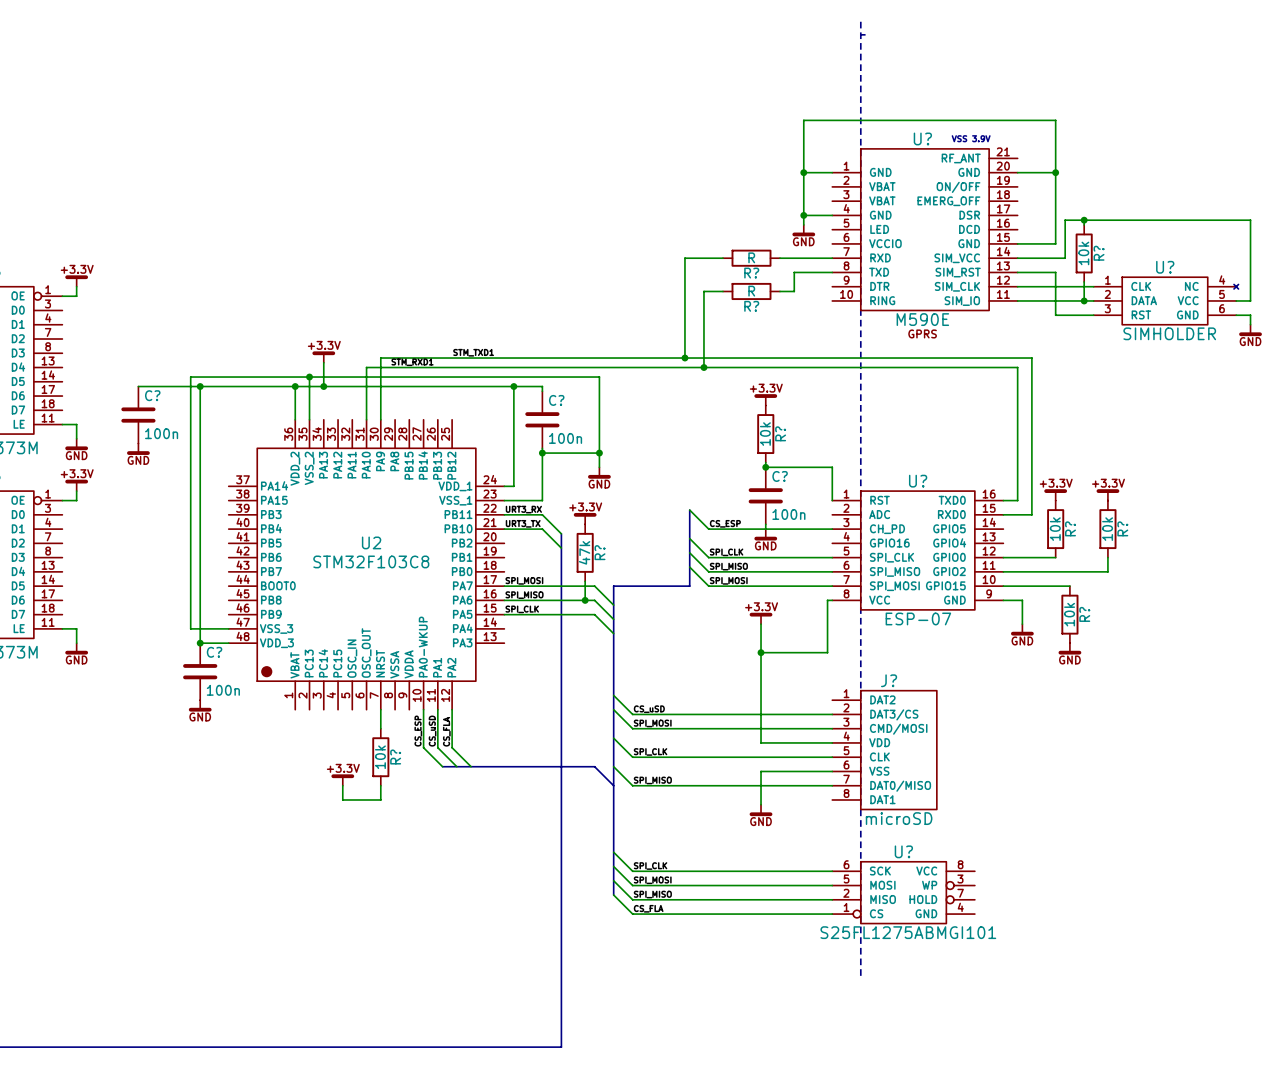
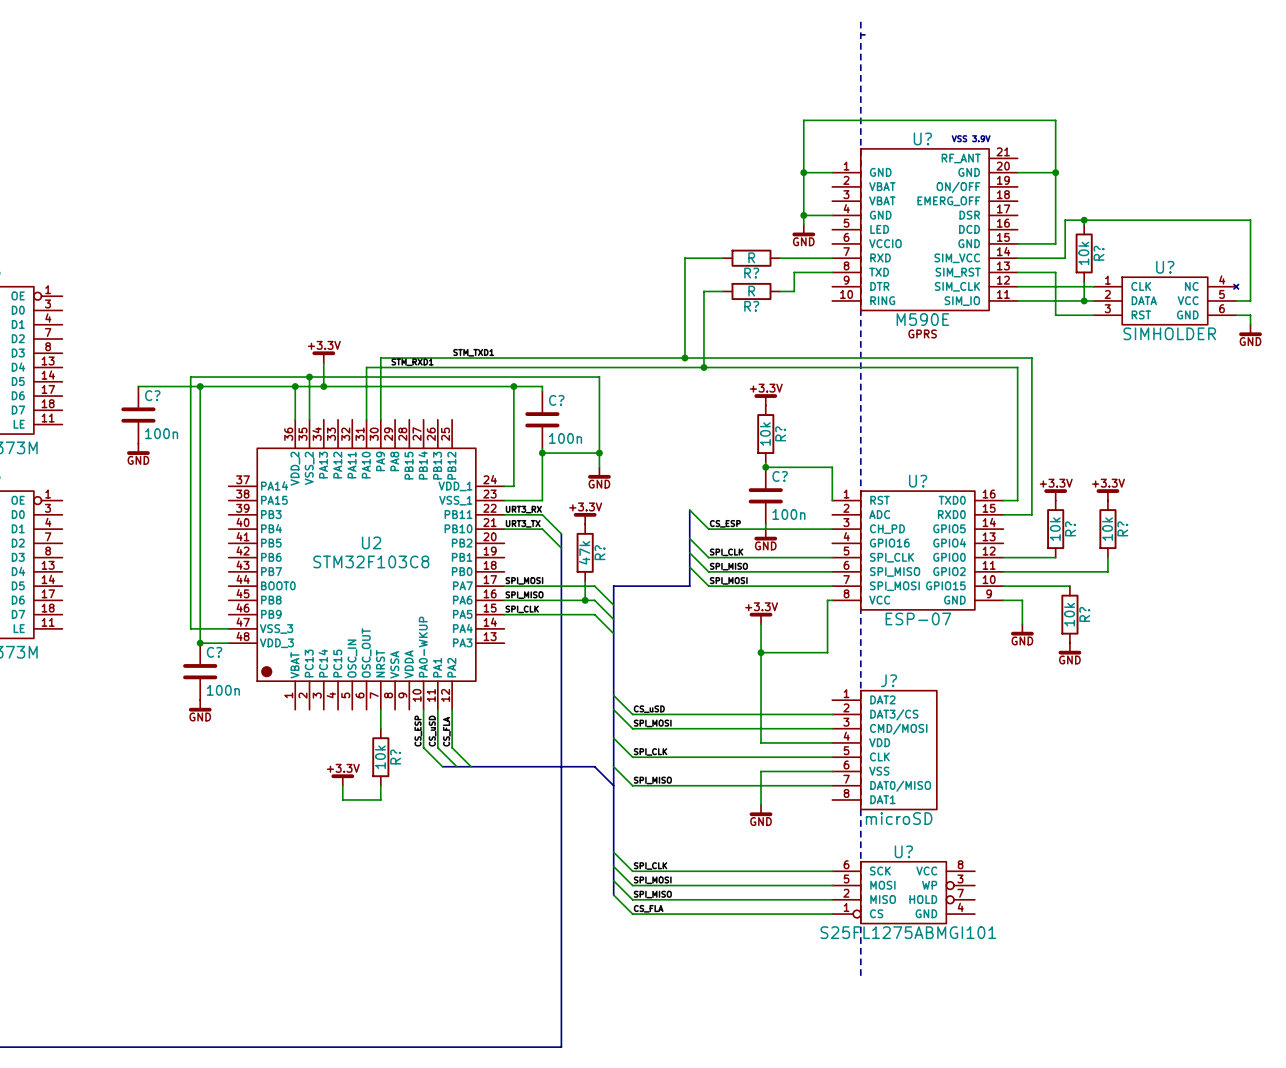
power symbol: (76, 281) -> none
wire: (76, 286) (76, 296) (62, 296) -> none
wire: (62, 424) (76, 424) (76, 438) -> none
power symbol: (76, 444) -> none
power symbol: (76, 485) -> none
wire: (76, 491) (76, 500) (62, 500) -> none
wire: (62, 628) (76, 628) (76, 643) -> none
power symbol: (76, 648) -> none

